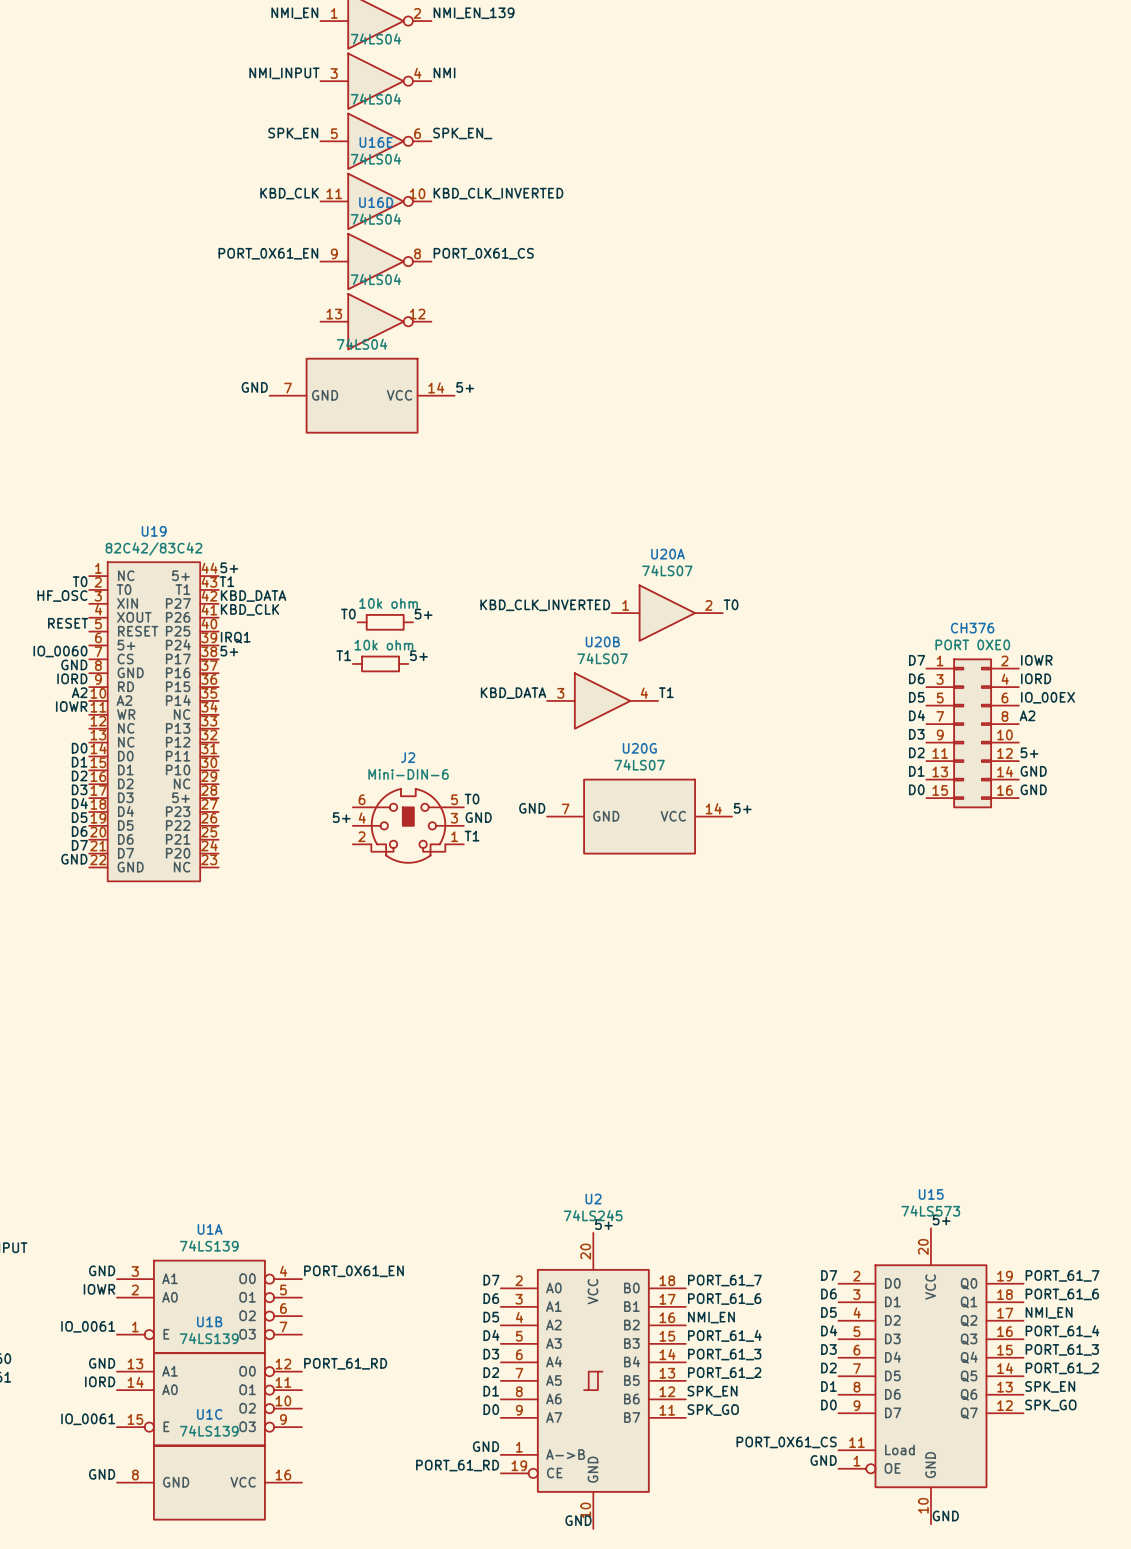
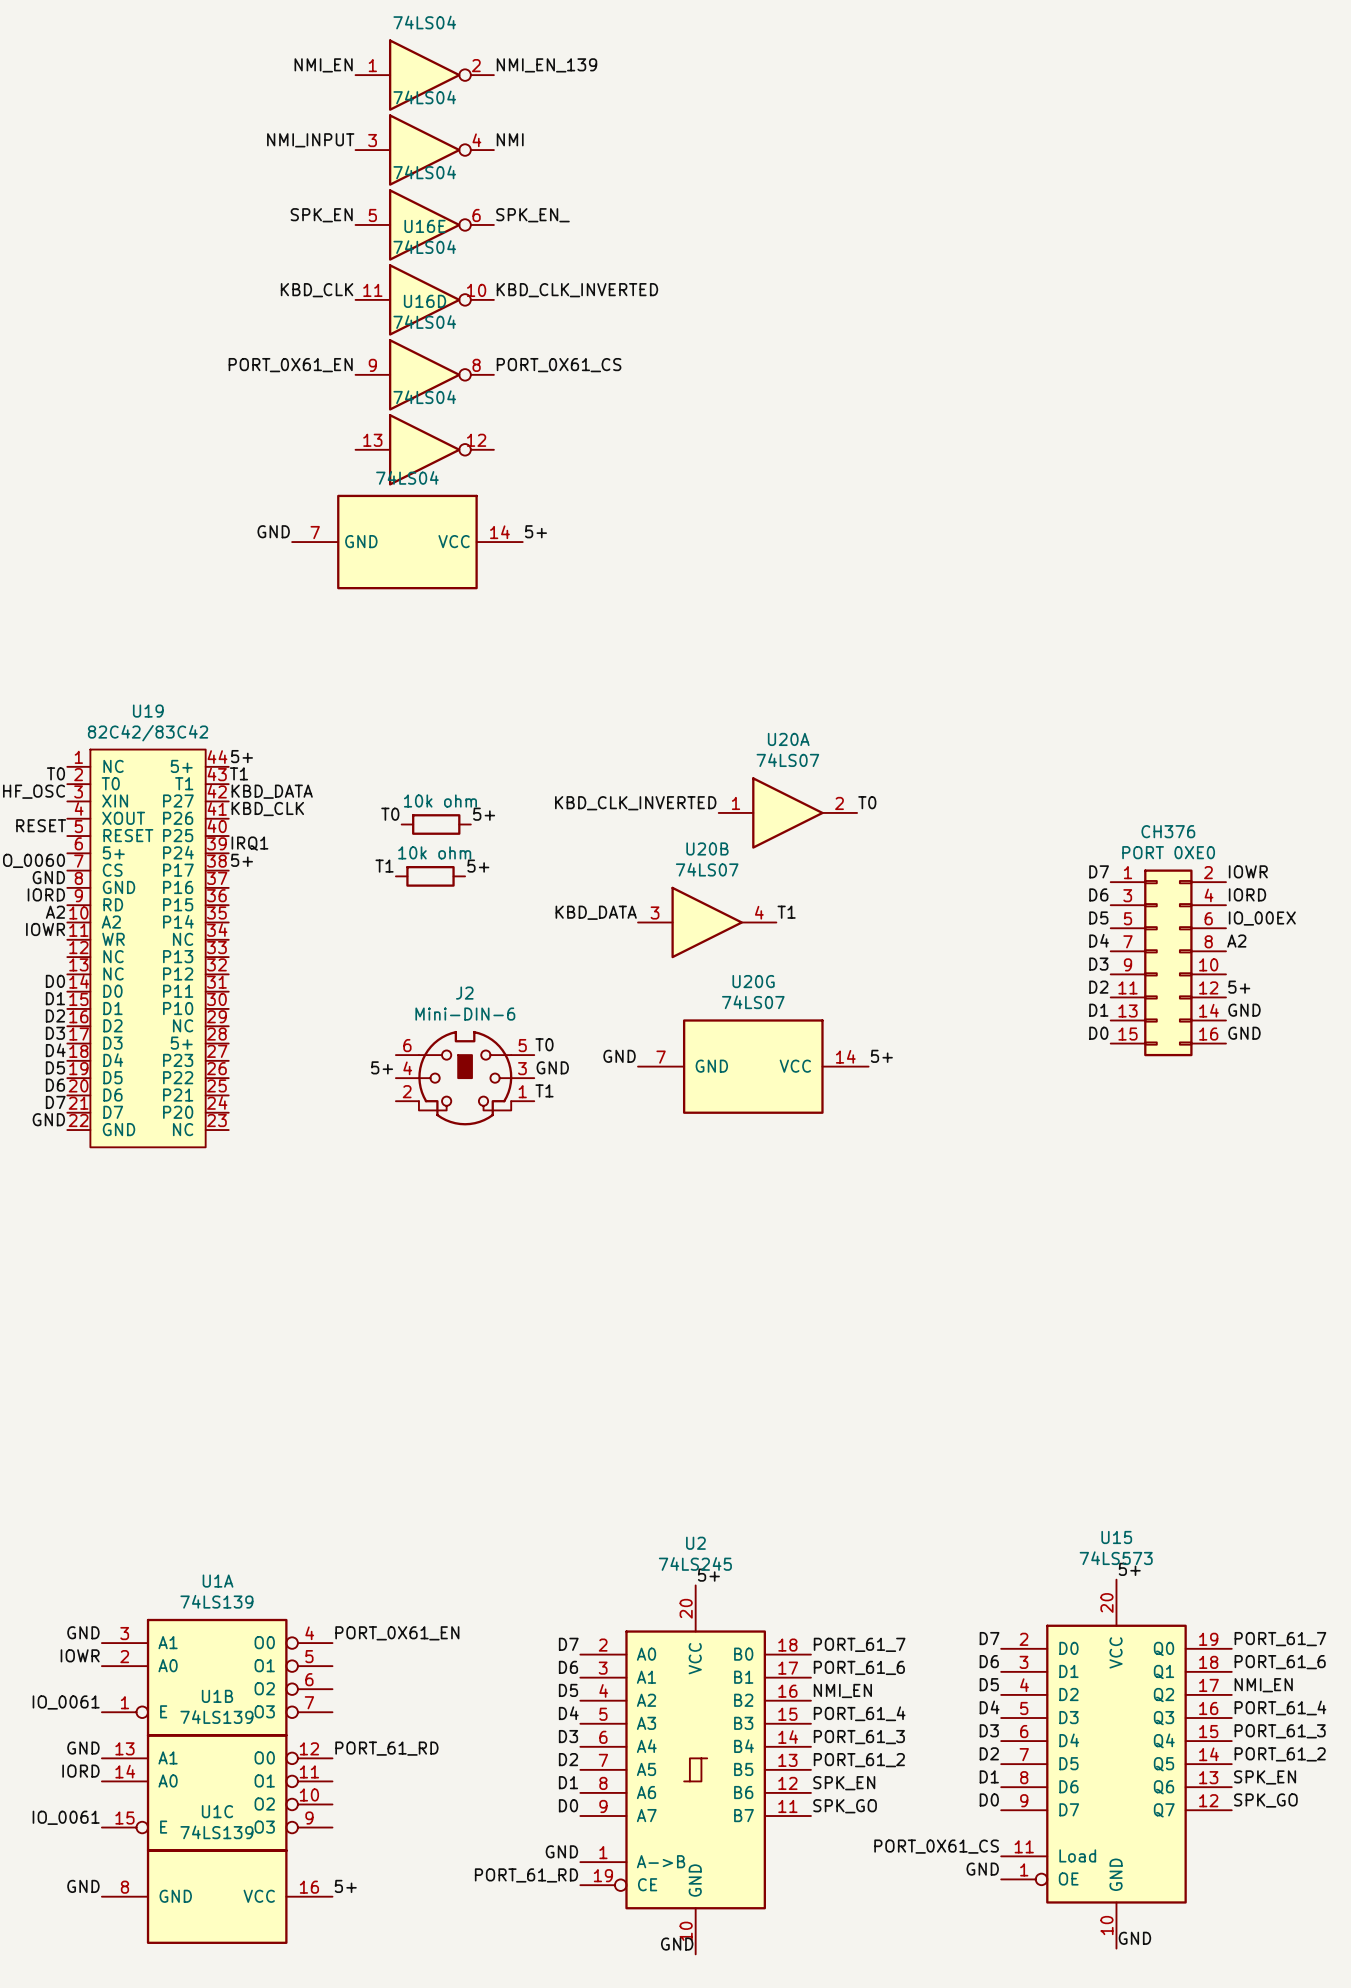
label: none -> 5+ (345, 1886)

